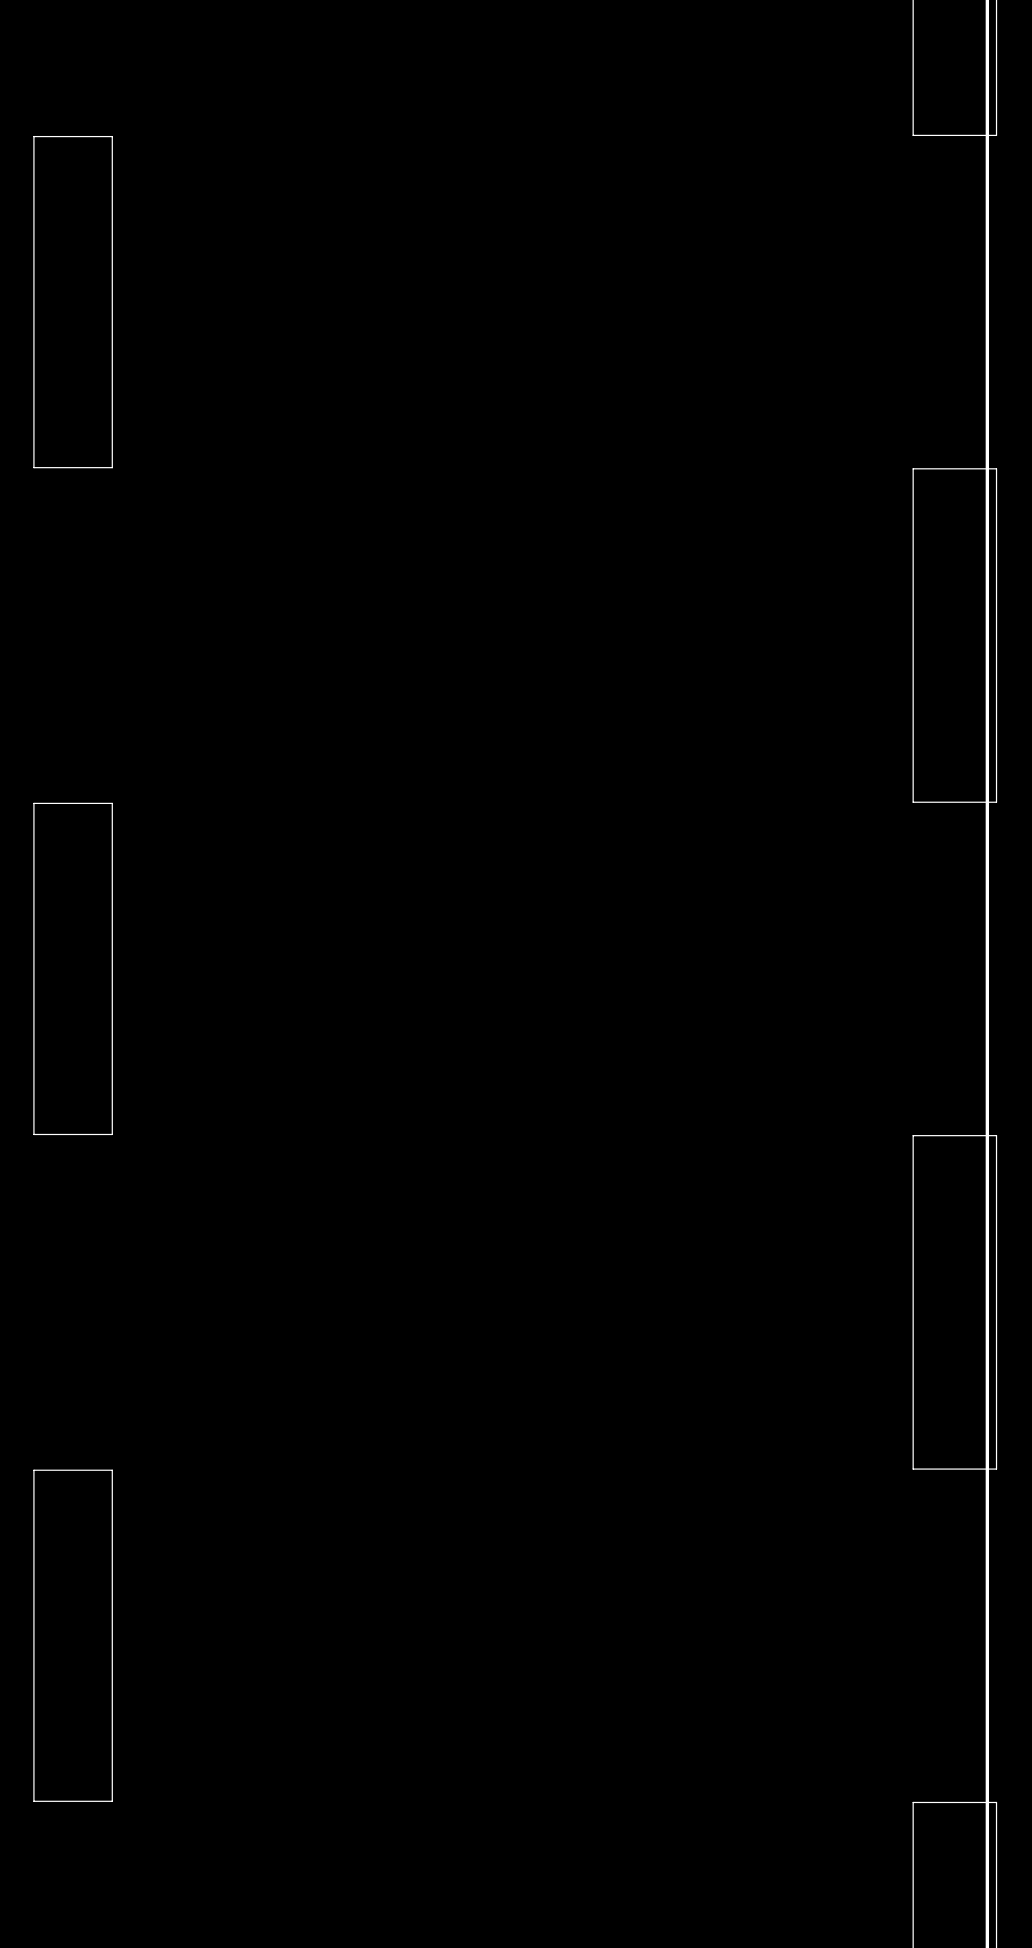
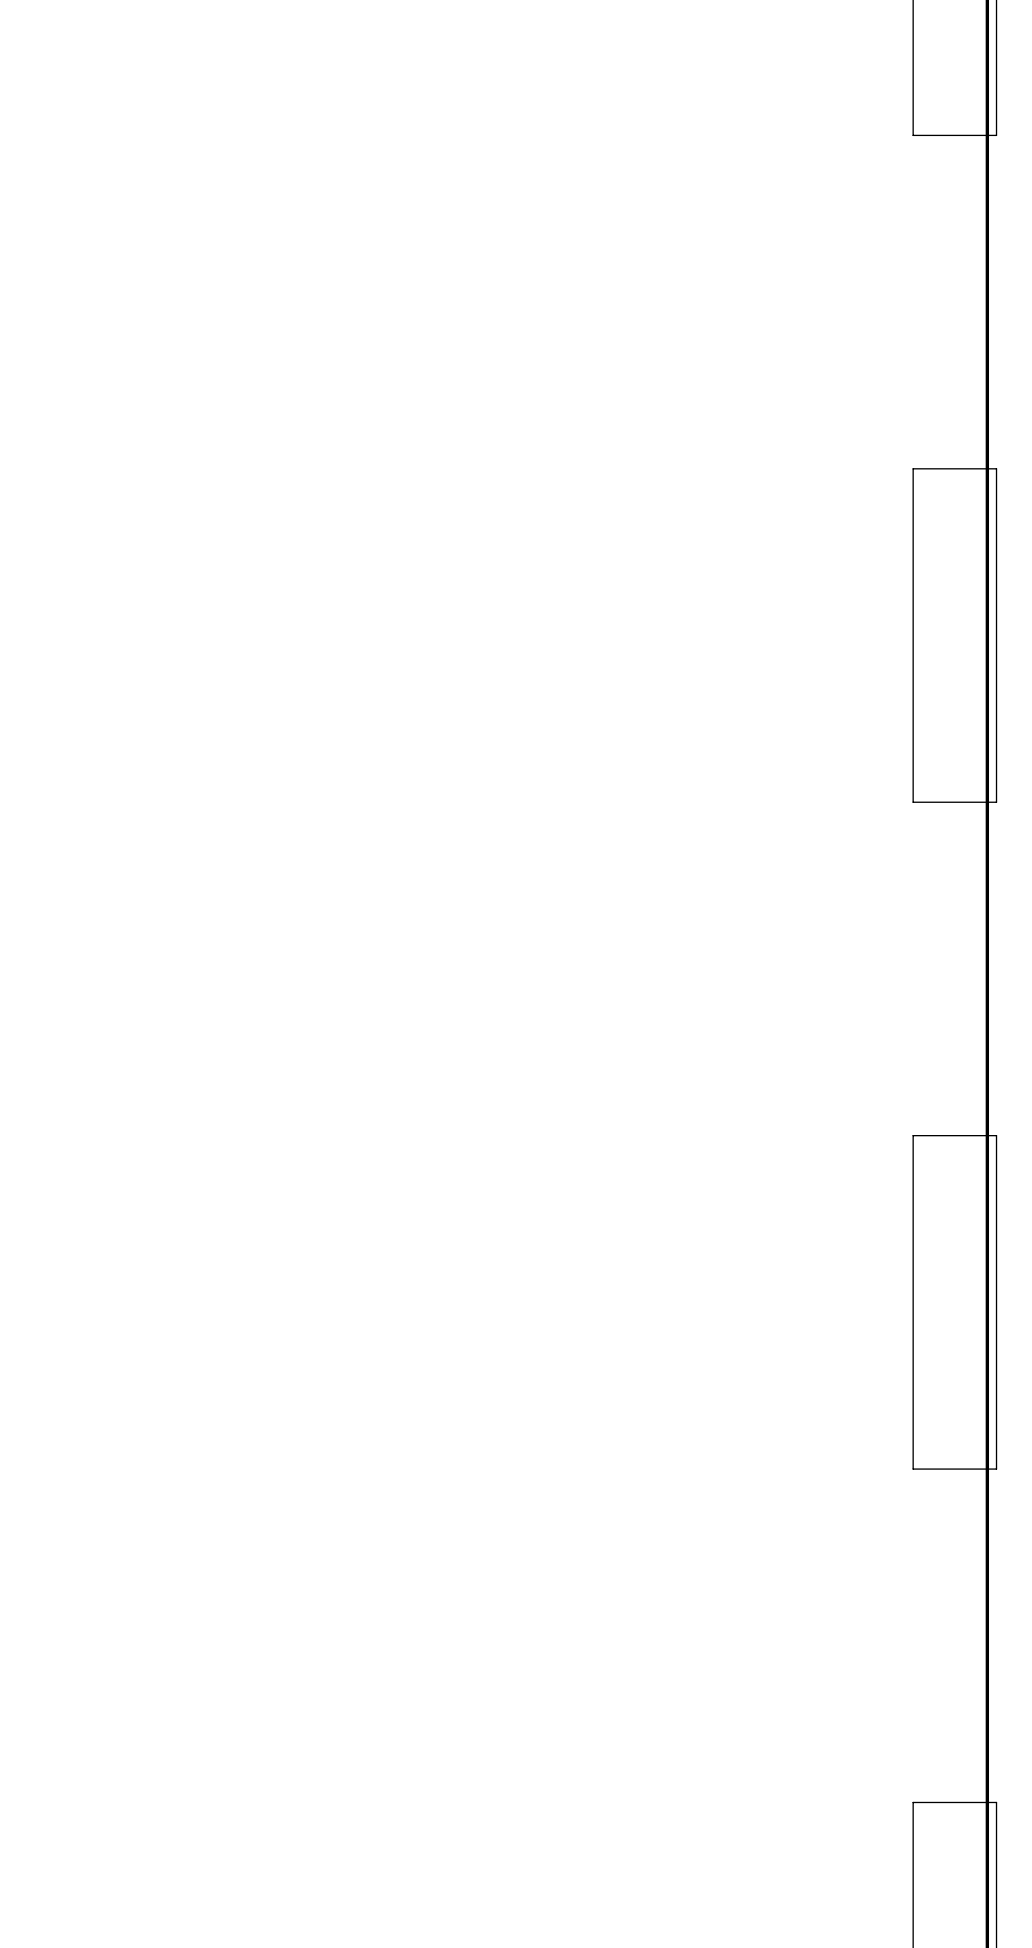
drawing: [33, 136, 113, 468] -> none
drawing: [33, 803, 113, 1135] -> none
drawing: [33, 1470, 113, 1802] -> none

